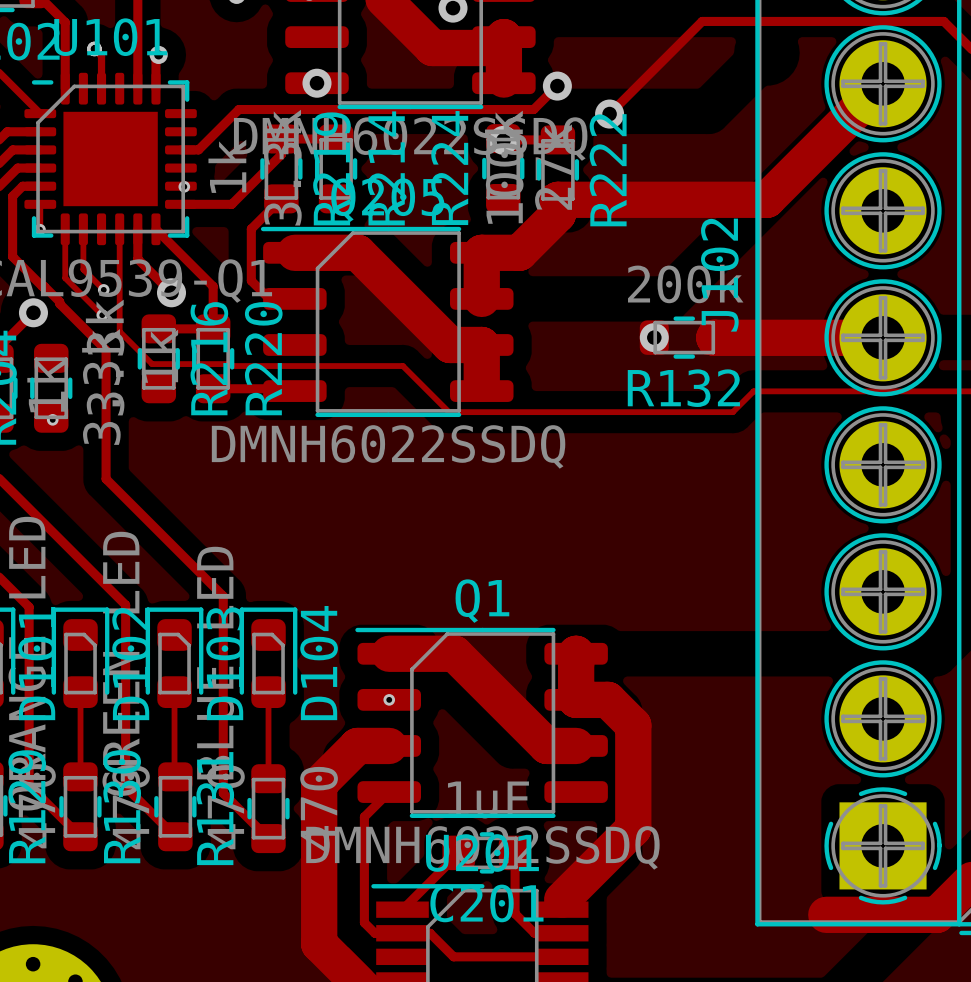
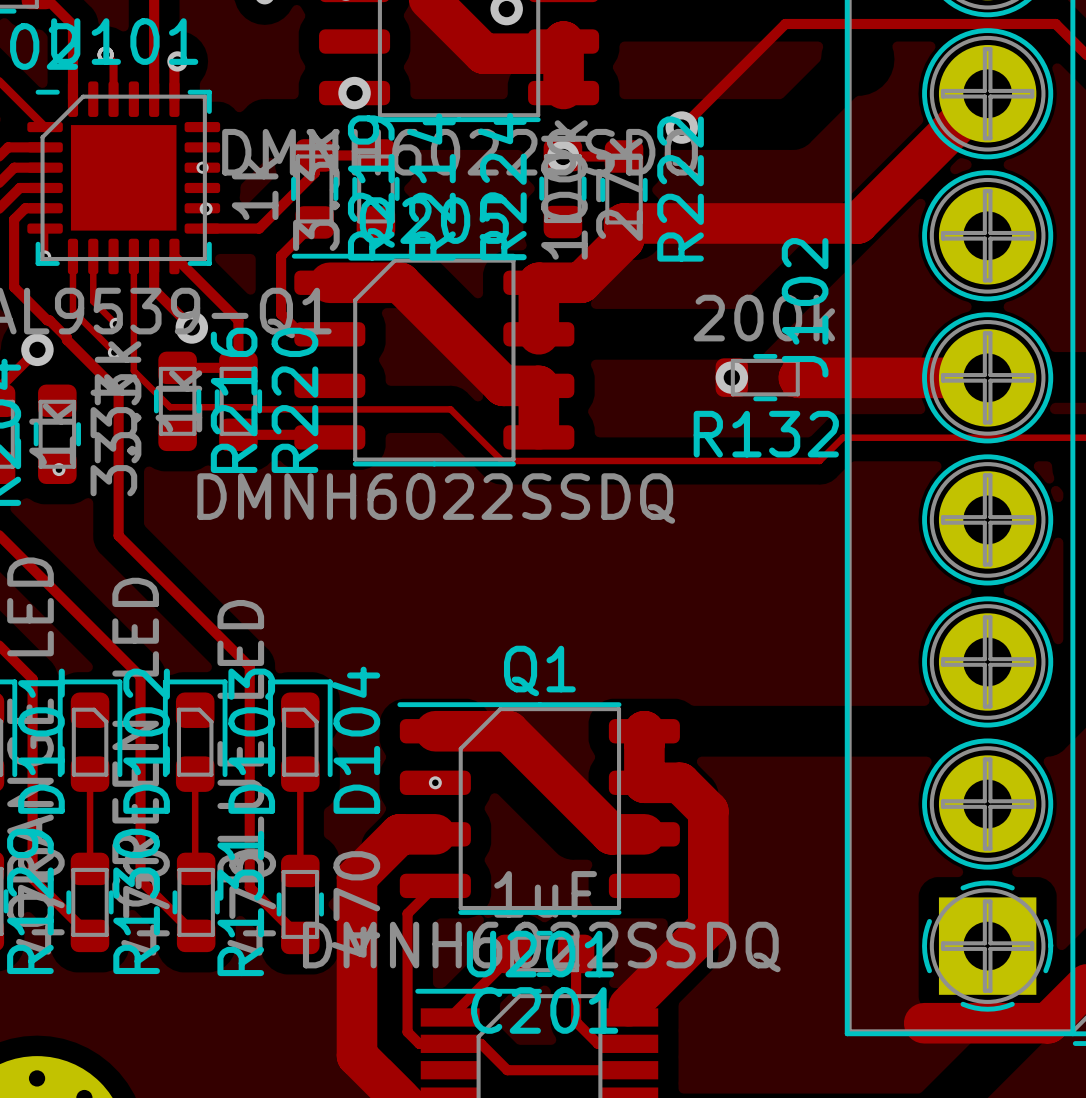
track: (557, 86) (533, 109) (238, 109) (198, 149) (180, 149) -> none
via: (557, 86) -> none
via: none -> (202, 167)

